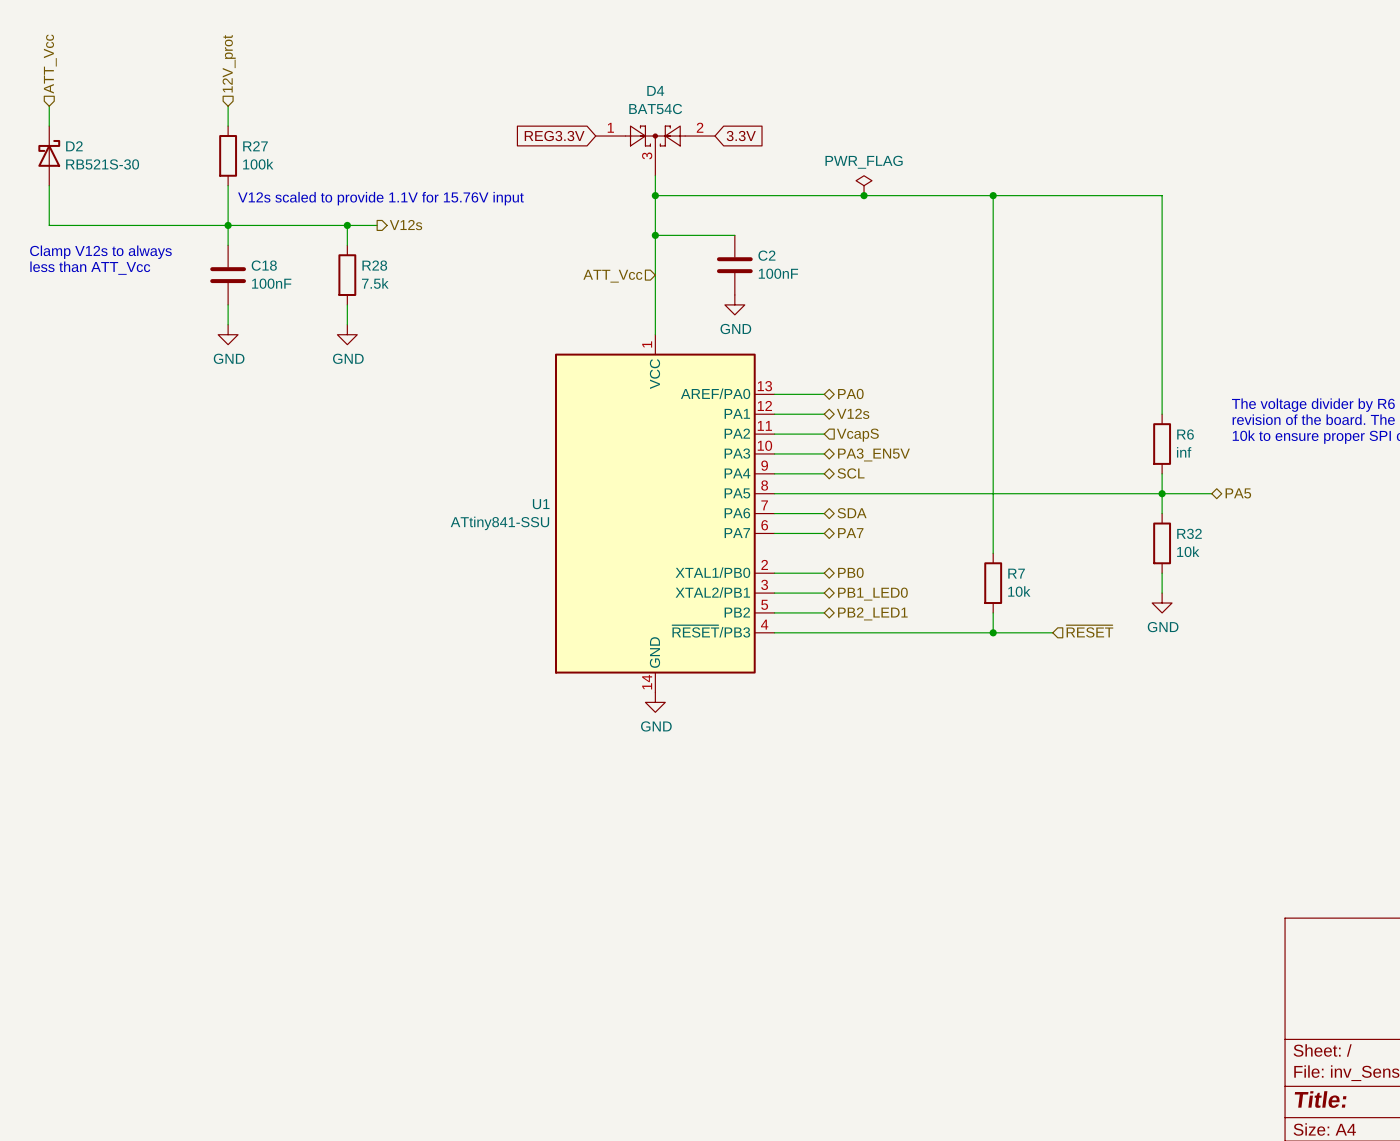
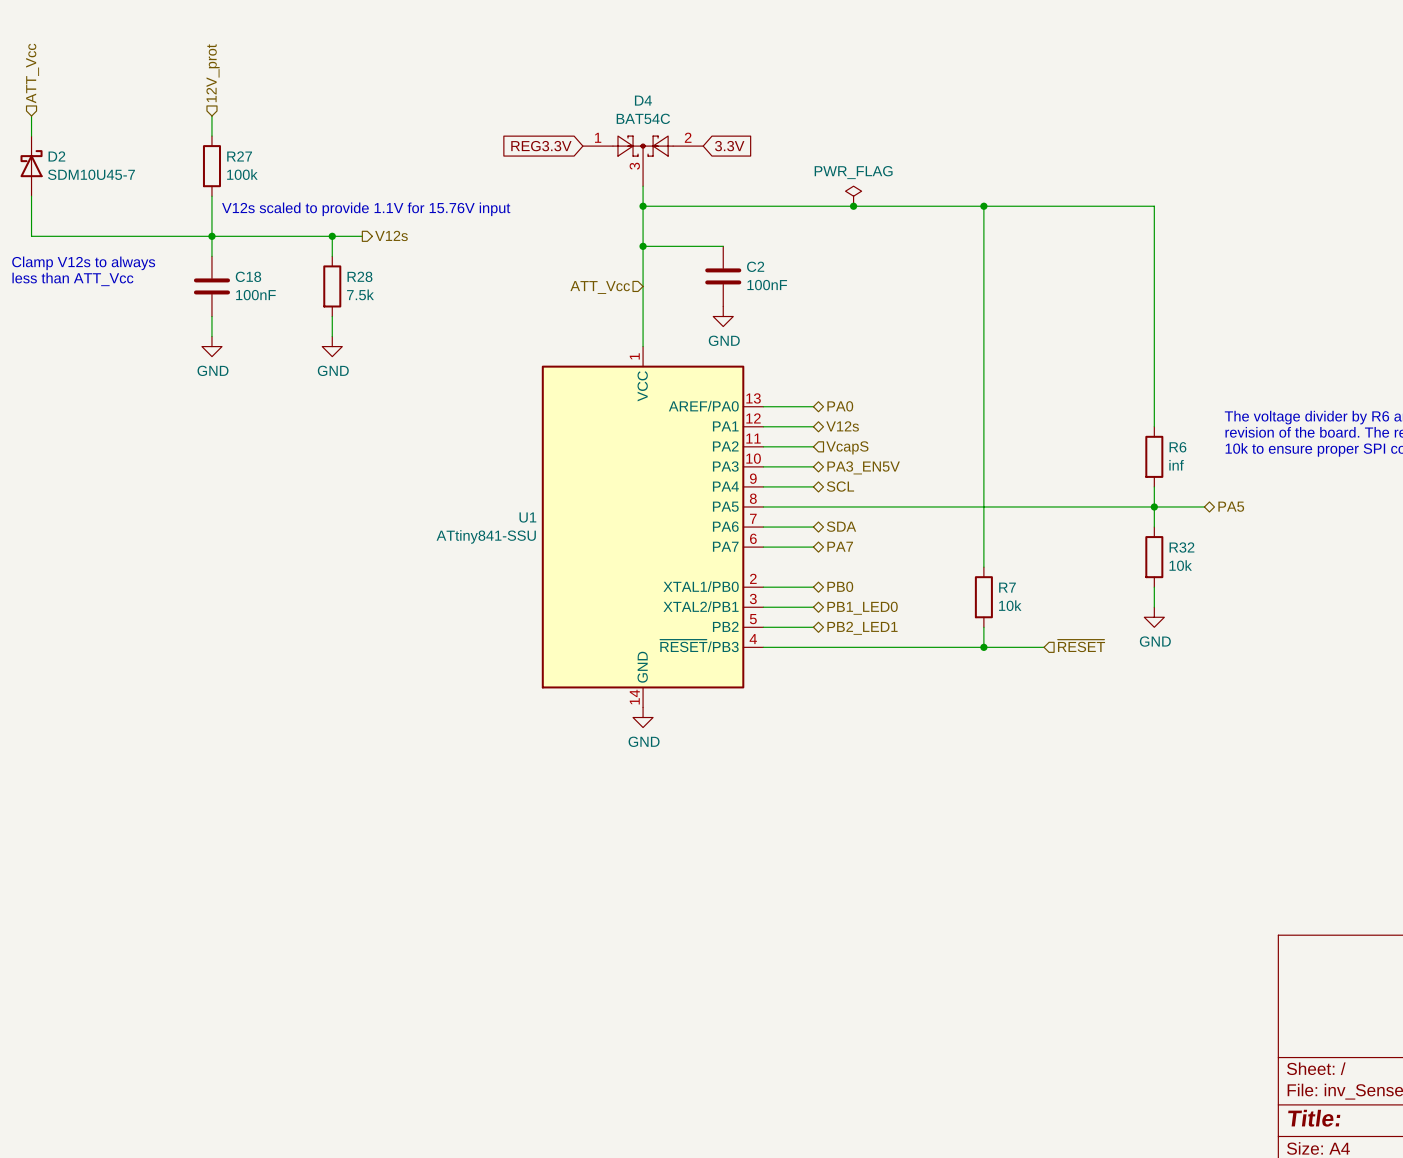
D2 value: RB521S-30 (102, 164) -> SDM10U45-7 (91, 174)

